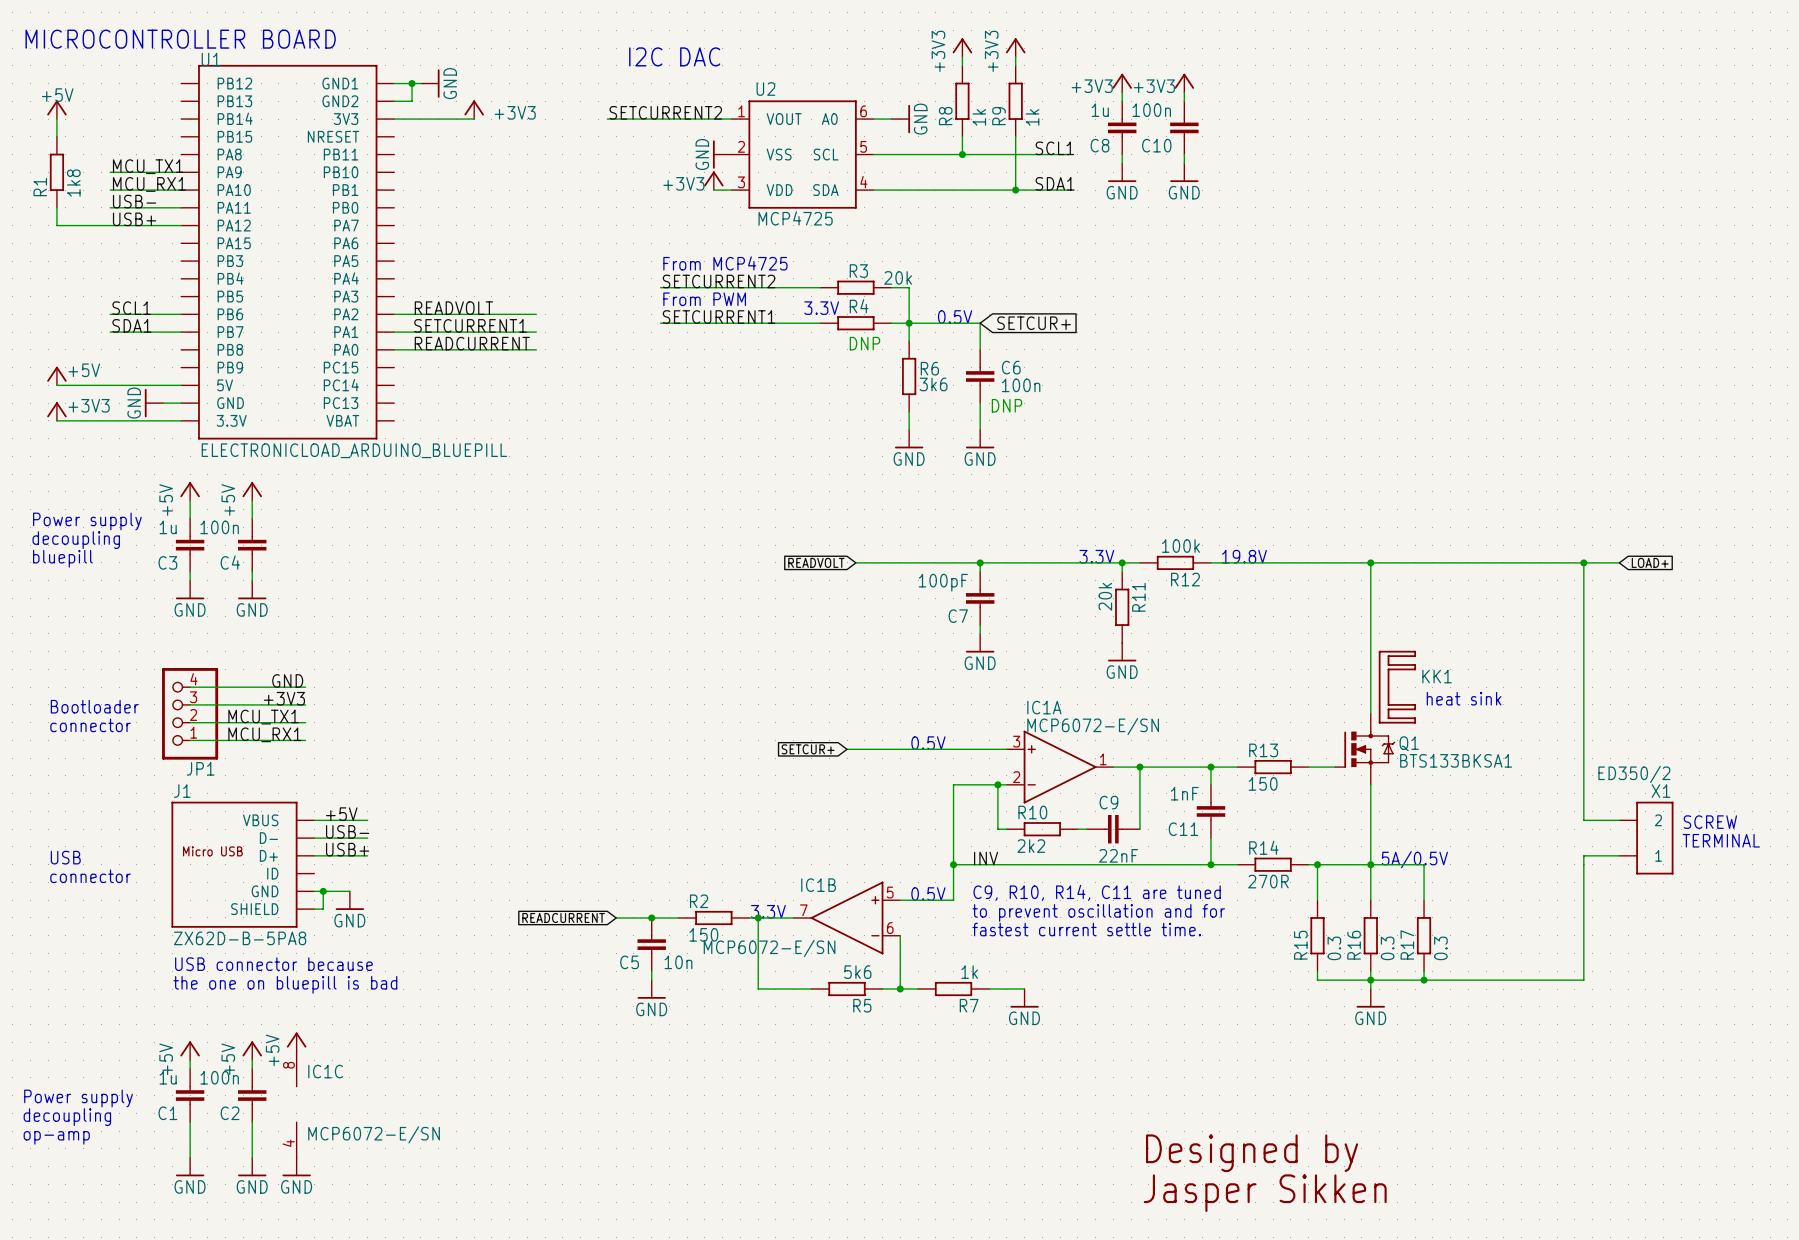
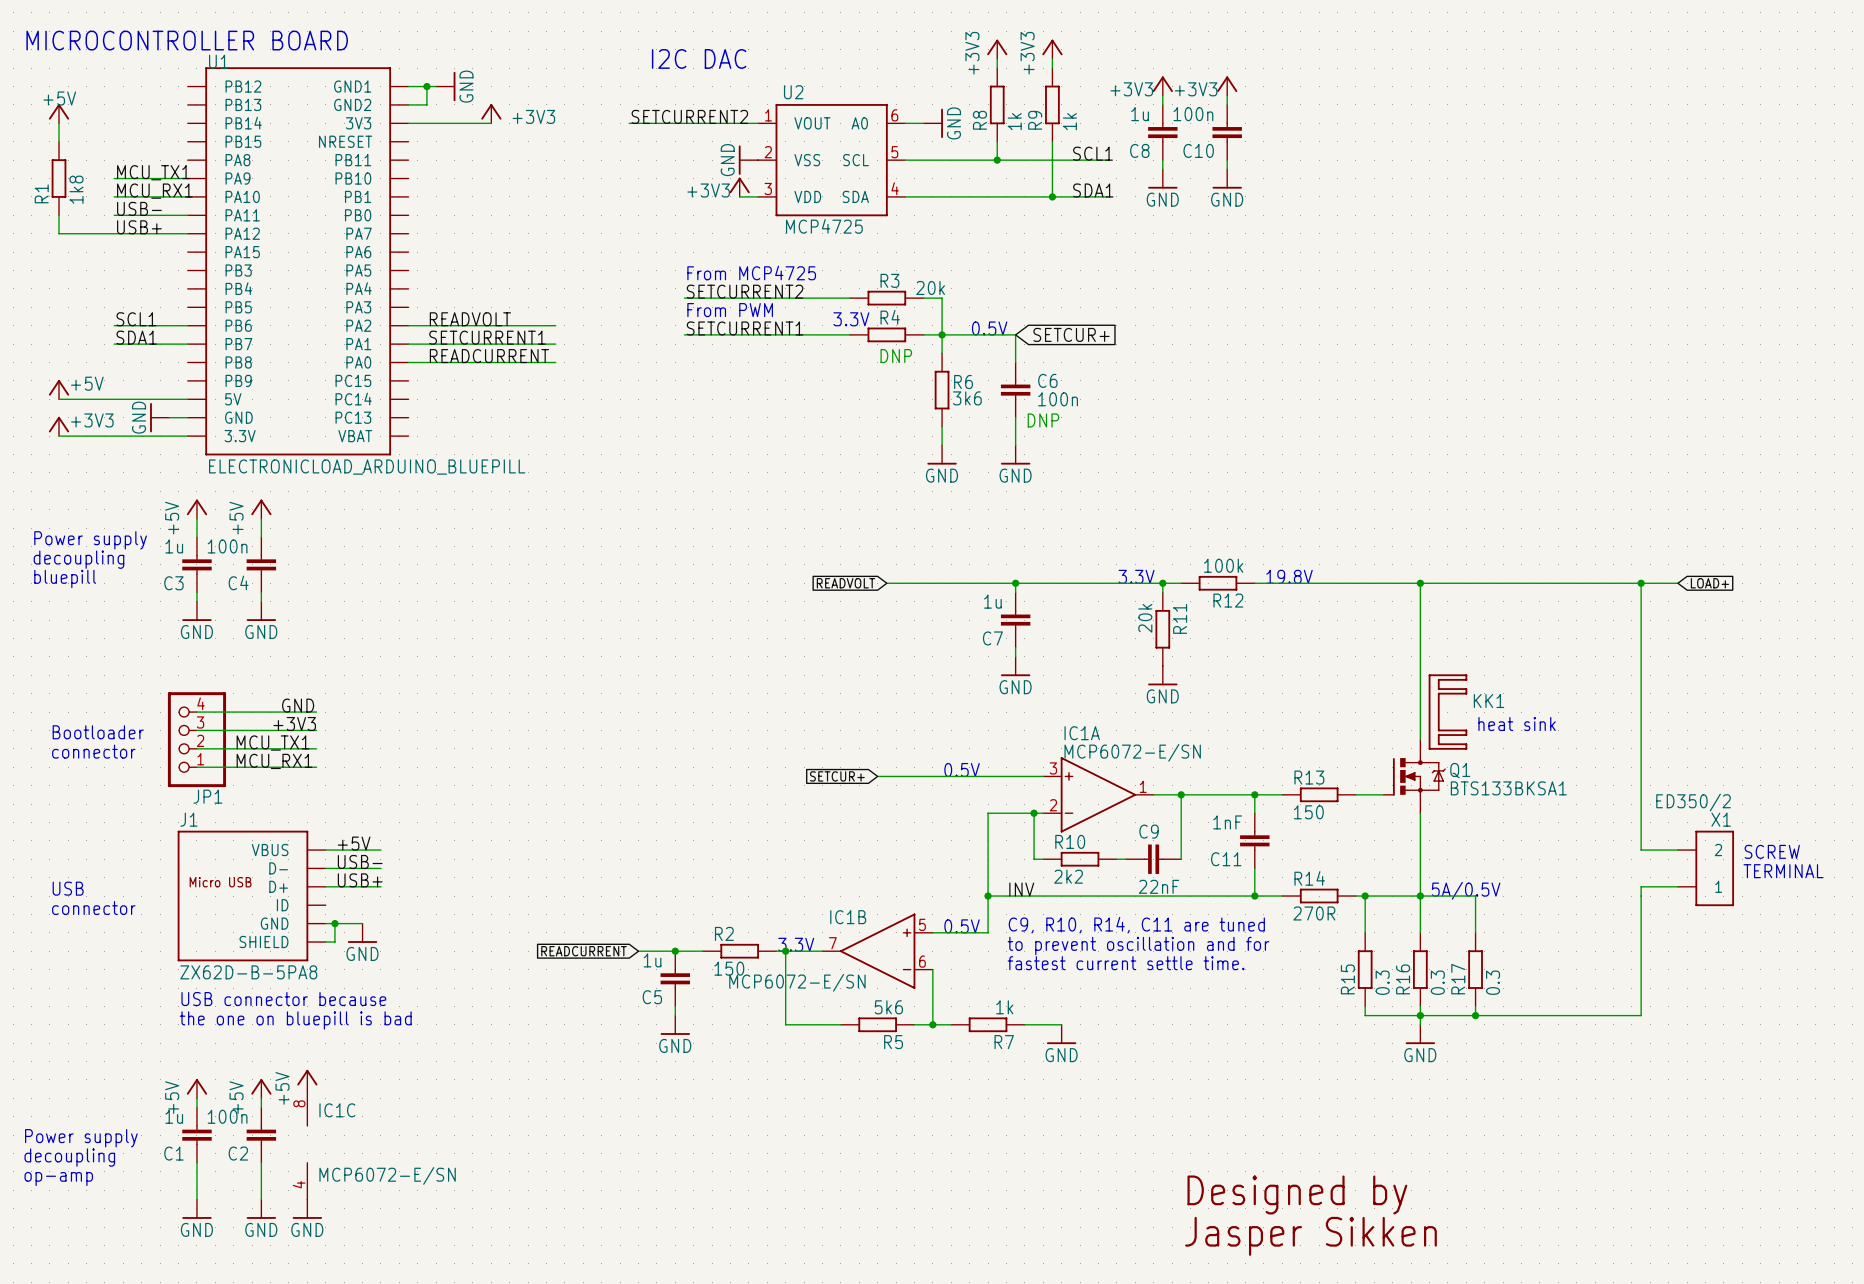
C7 value: 100pF (943, 582) -> 1u (992, 601)
C5 value: 10n (678, 962) -> 1u (652, 960)

